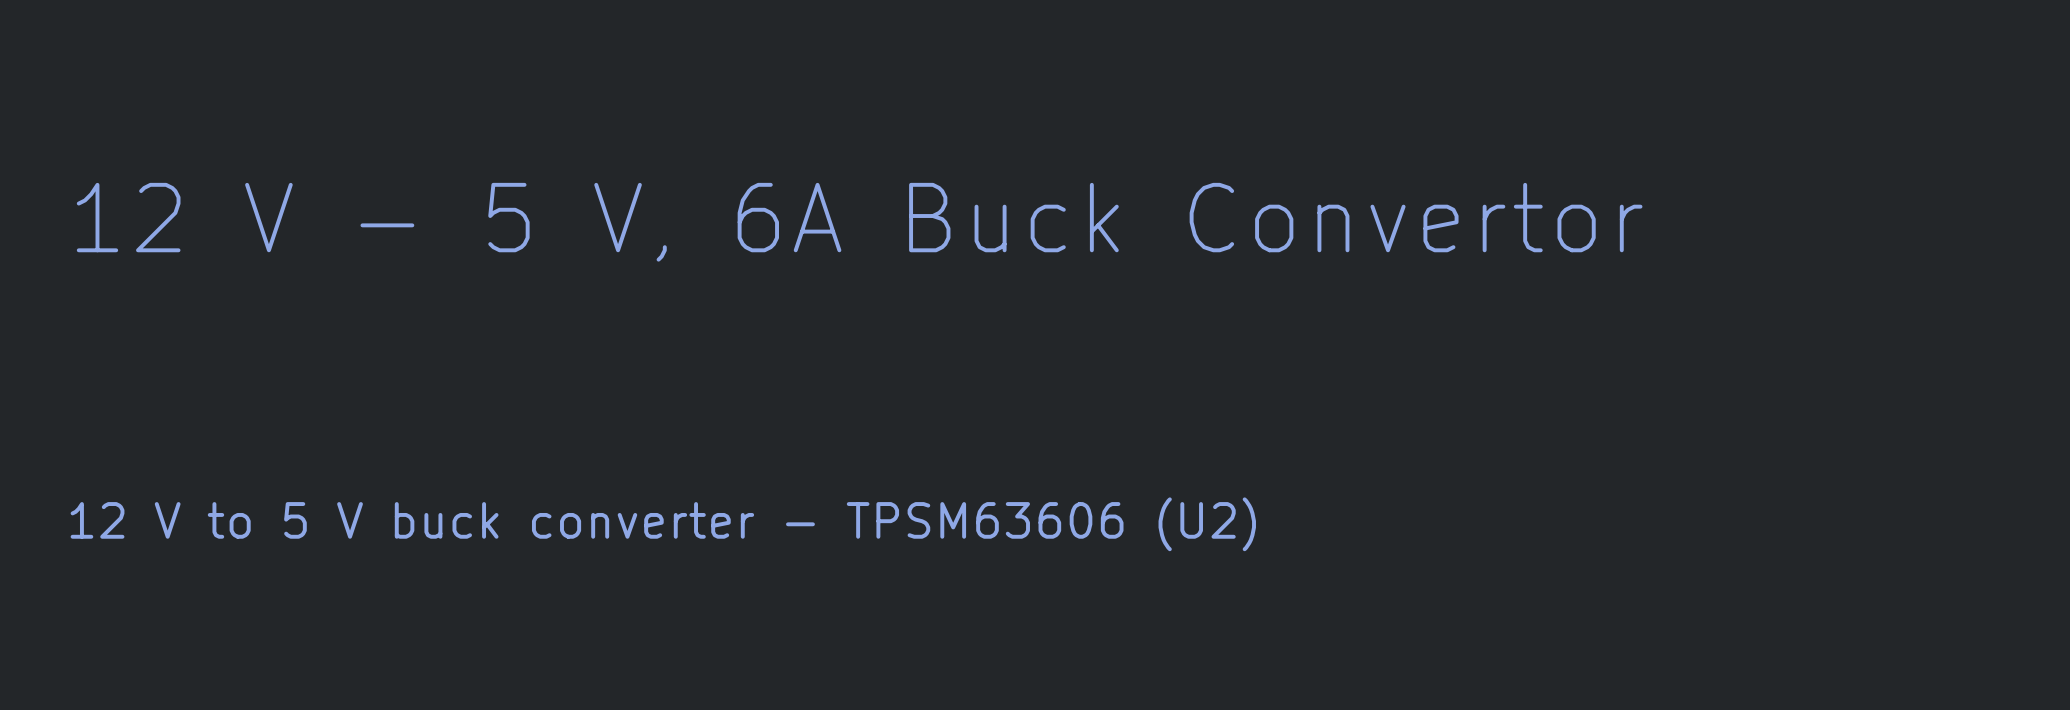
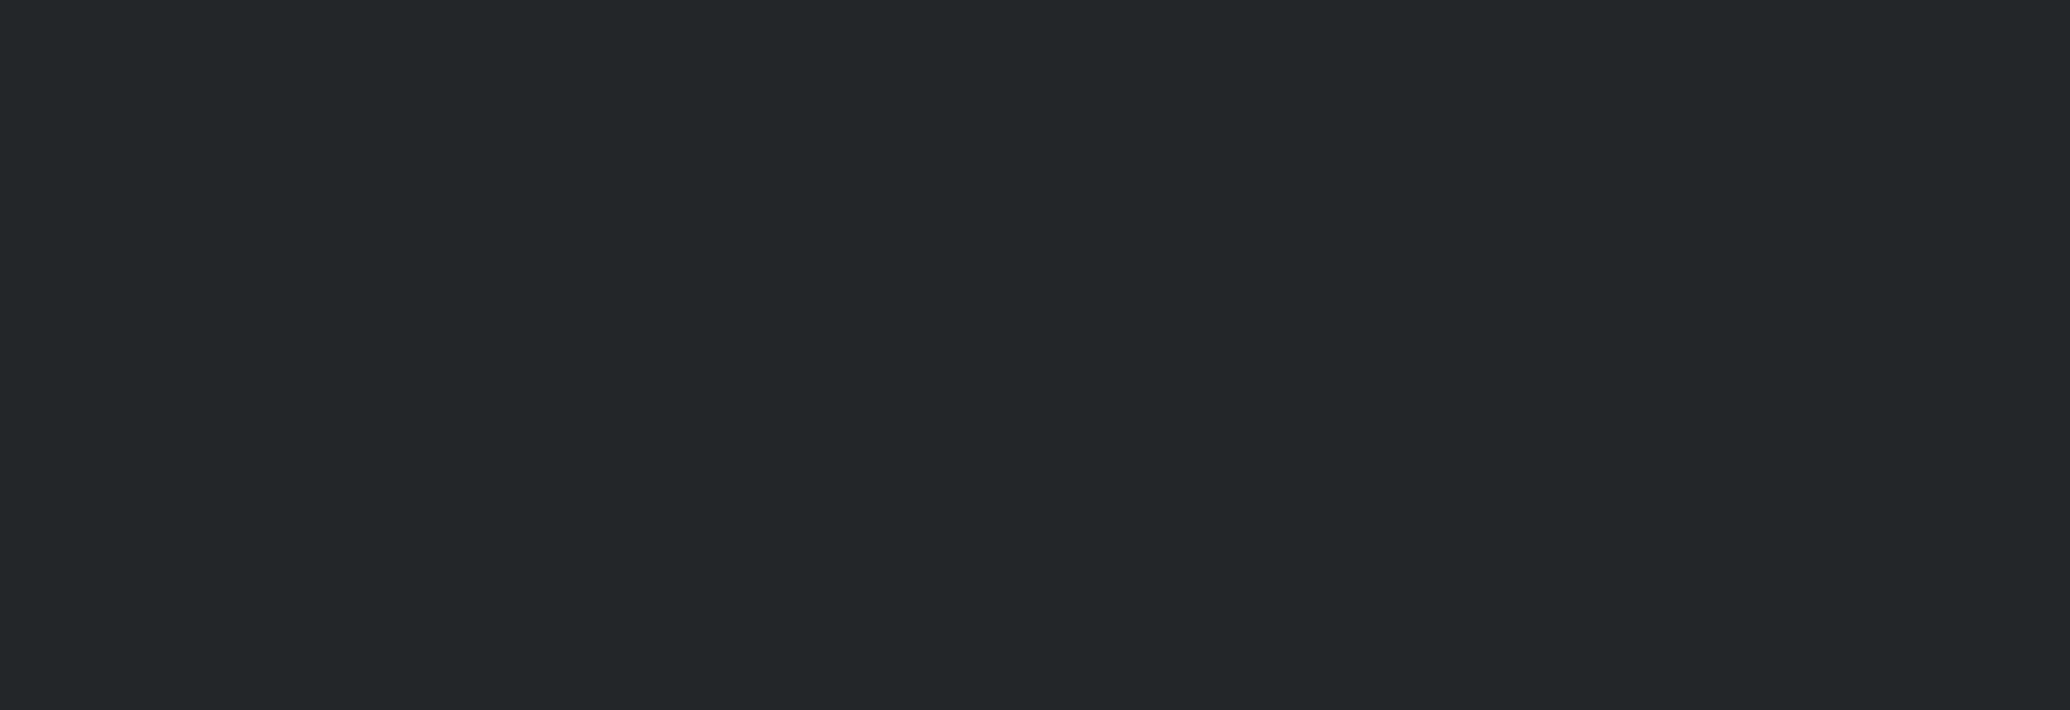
text: 12 V - 5 V, 6A Buck Convertor (859, 222) -> none
text: 12 V to 5 V buck converter - TPSM63606 (U2) (663, 524) -> none

